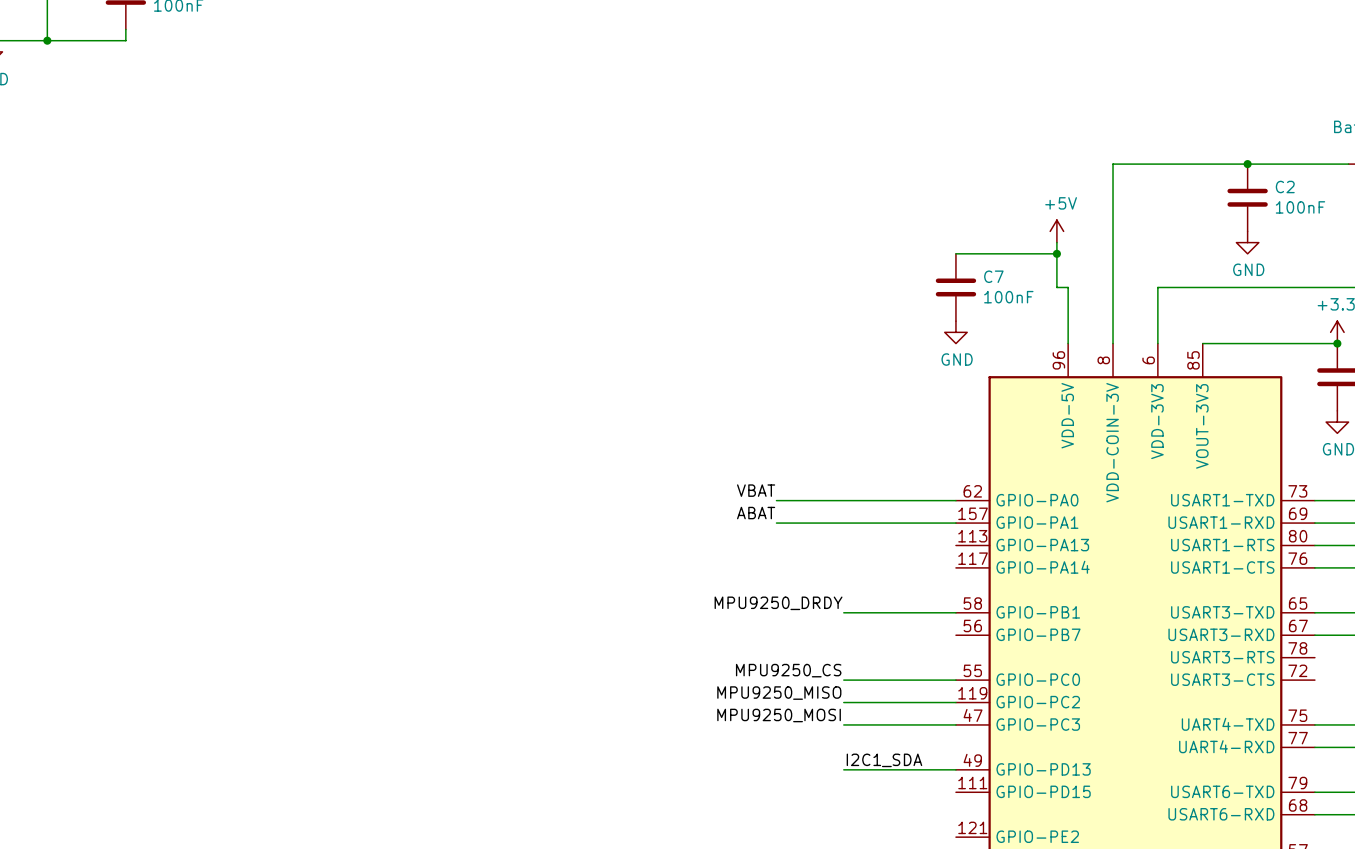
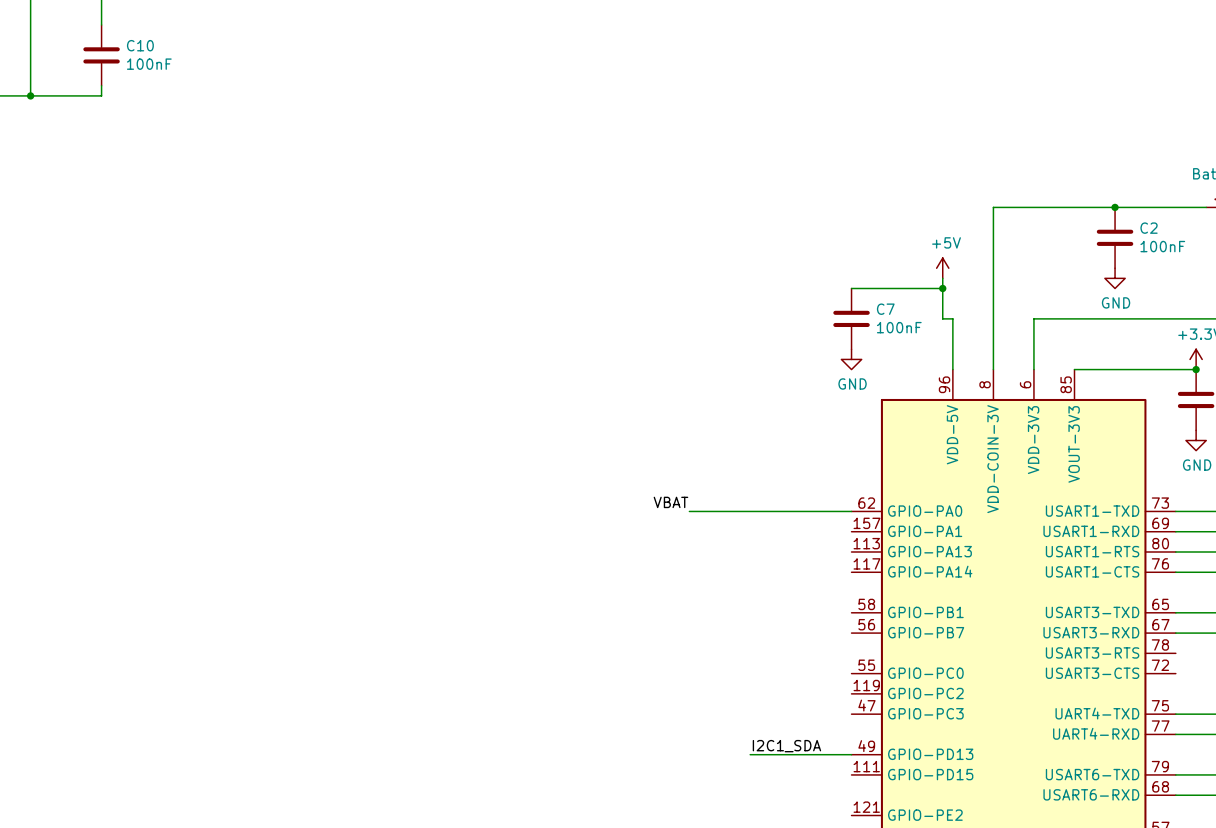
label: ABAT (756, 513) -> none
wire: (776, 523) (955, 523) -> none
label: MPU9250_DRDY (778, 603) -> none
wire: (843, 612) (955, 612) -> none
label: MPU9250_CS (788, 670) -> none
wire: (843, 680) (955, 680) -> none
label: MPU9250_MISO (779, 693) -> none
wire: (843, 702) (955, 702) -> none
label: MPU9250_MOSI (779, 715) -> none
wire: (843, 724) (955, 724) -> none

